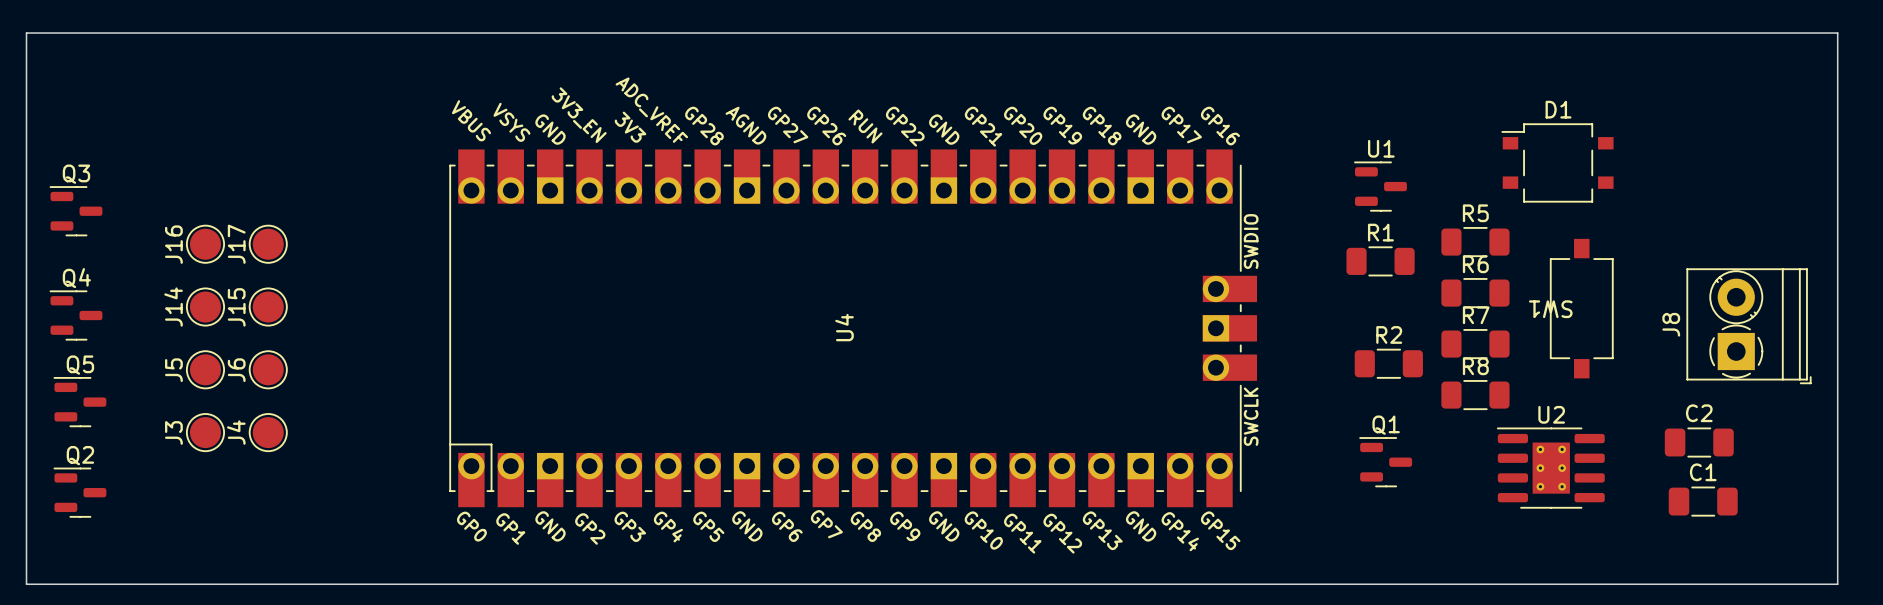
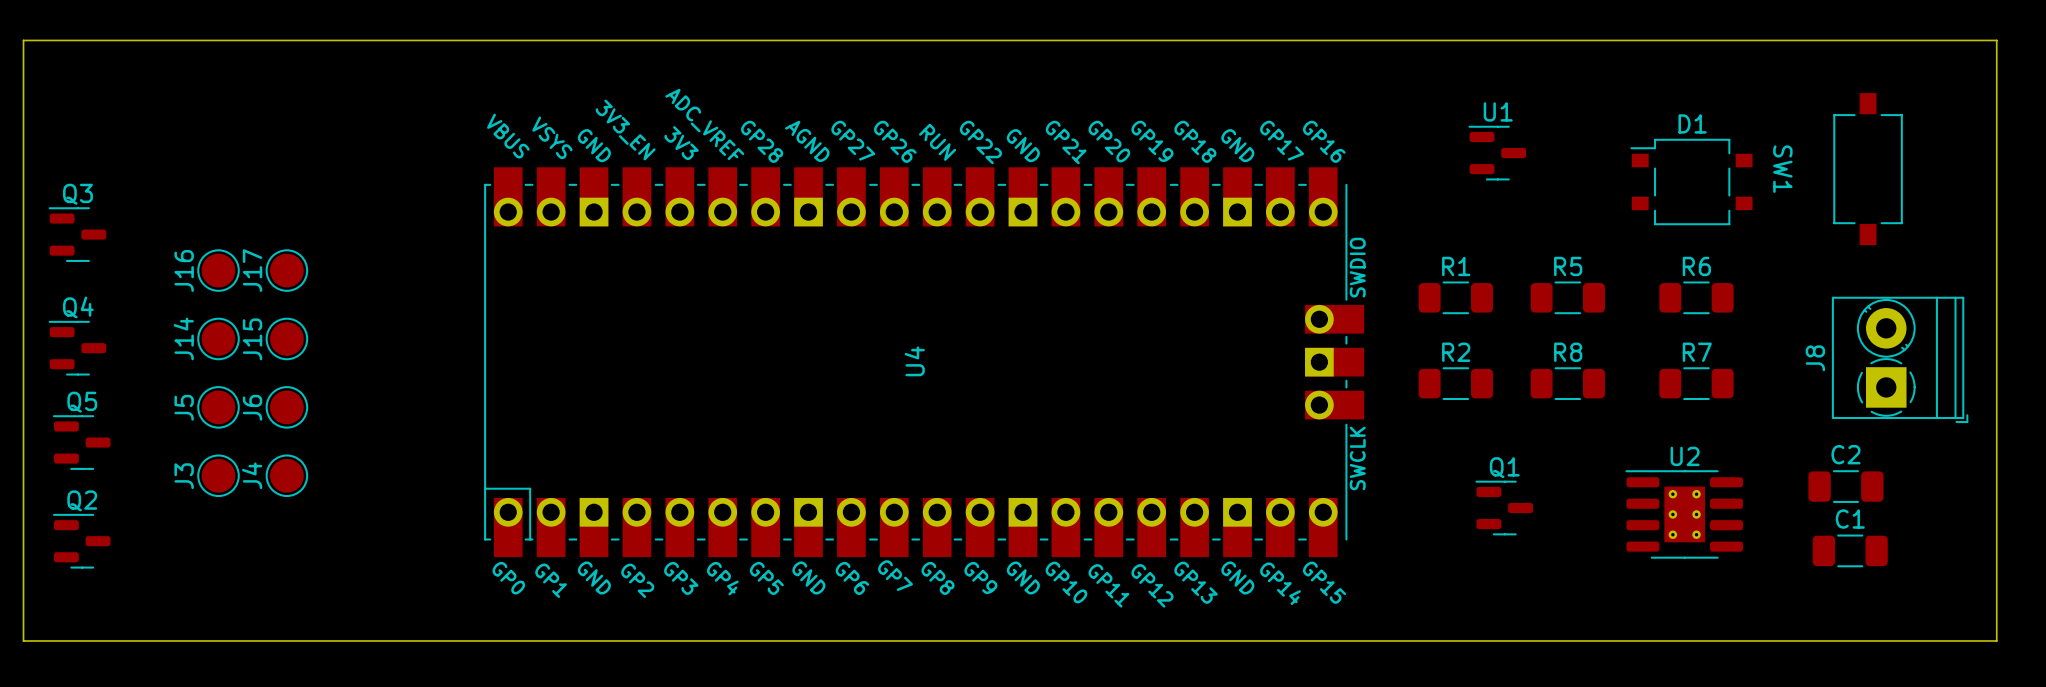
U1 position: (1380, 186) -> (1497, 153)
R5 position: (1475, 242) -> (1567, 297)
R1 position: (1380, 261) -> (1455, 297)
R6 position: (1475, 293) -> (1696, 297)
SW1 position: (1581, 308) -> (1868, 169)
SW1 name rotation: 0° (1550, 309) -> 90° counterclockwise (1782, 169)
R7 position: (1475, 344) -> (1696, 383)
R2 position: (1388, 363) -> (1455, 383)
R8 position: (1475, 395) -> (1567, 383)

